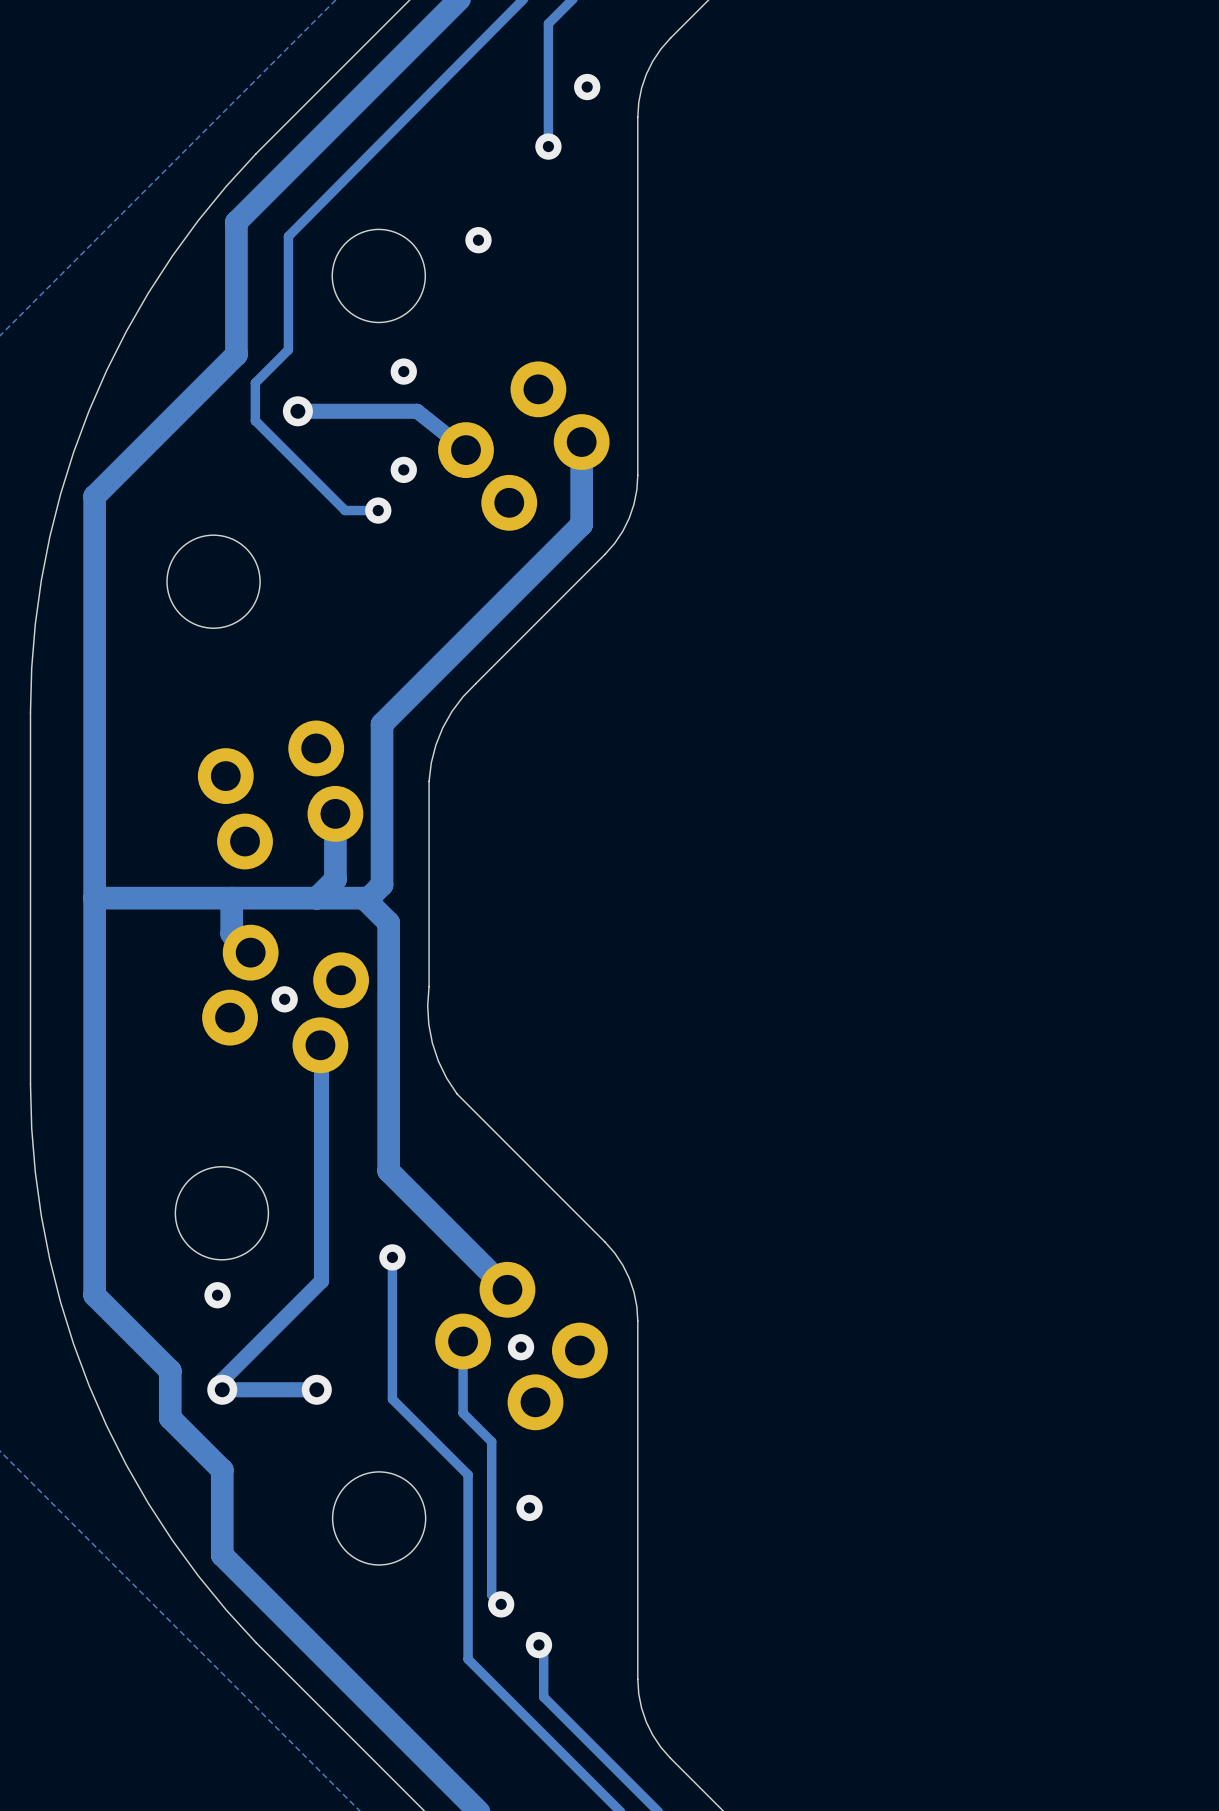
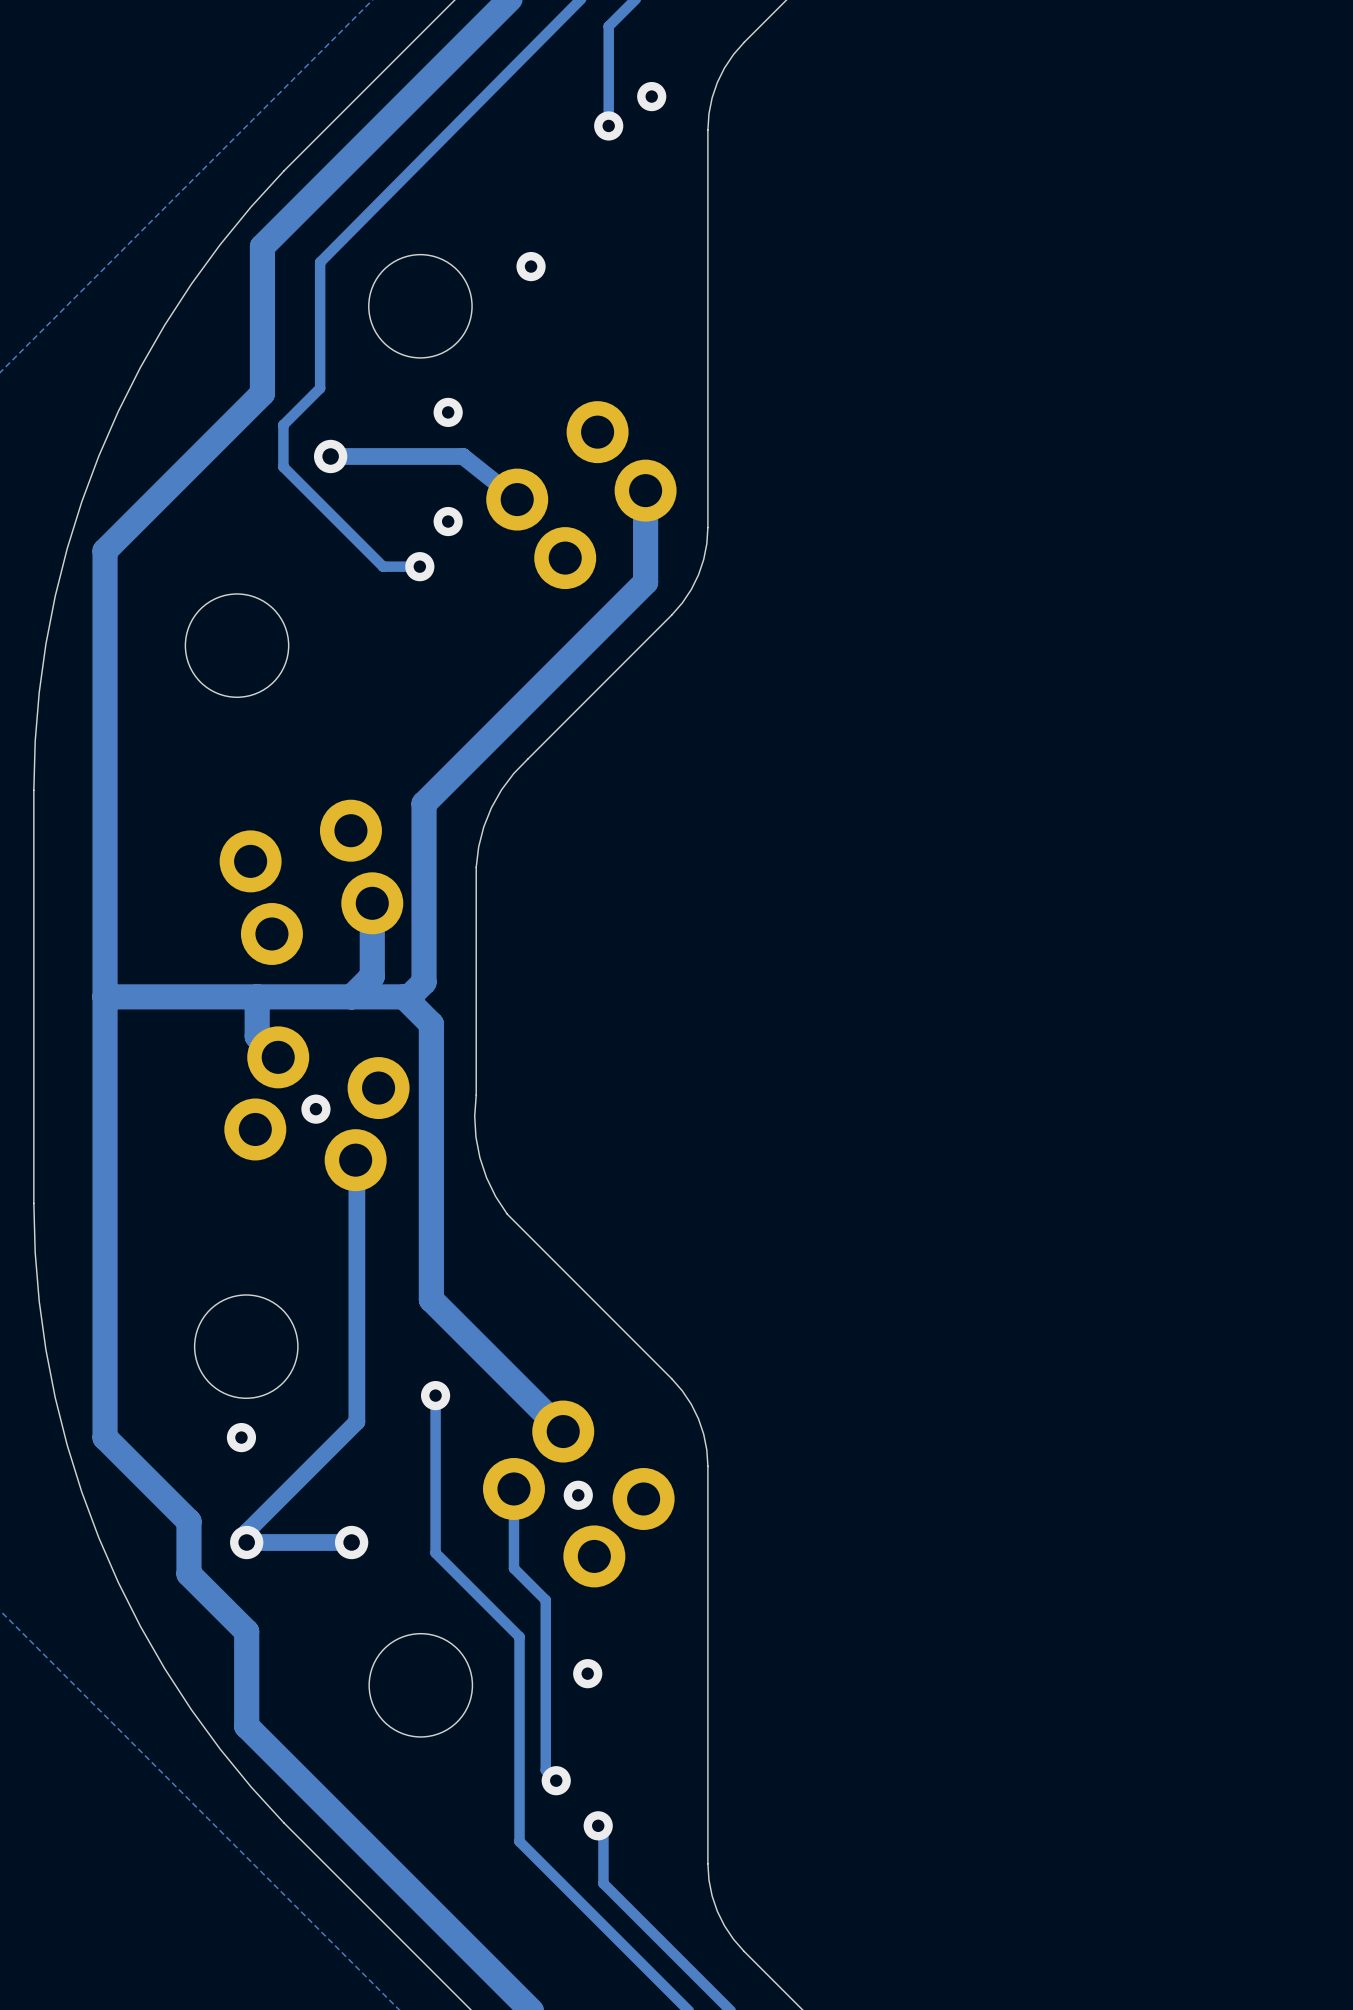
track: (548, 113) (548, 146) -> none
via position: (548, 146) -> (608, 125)

